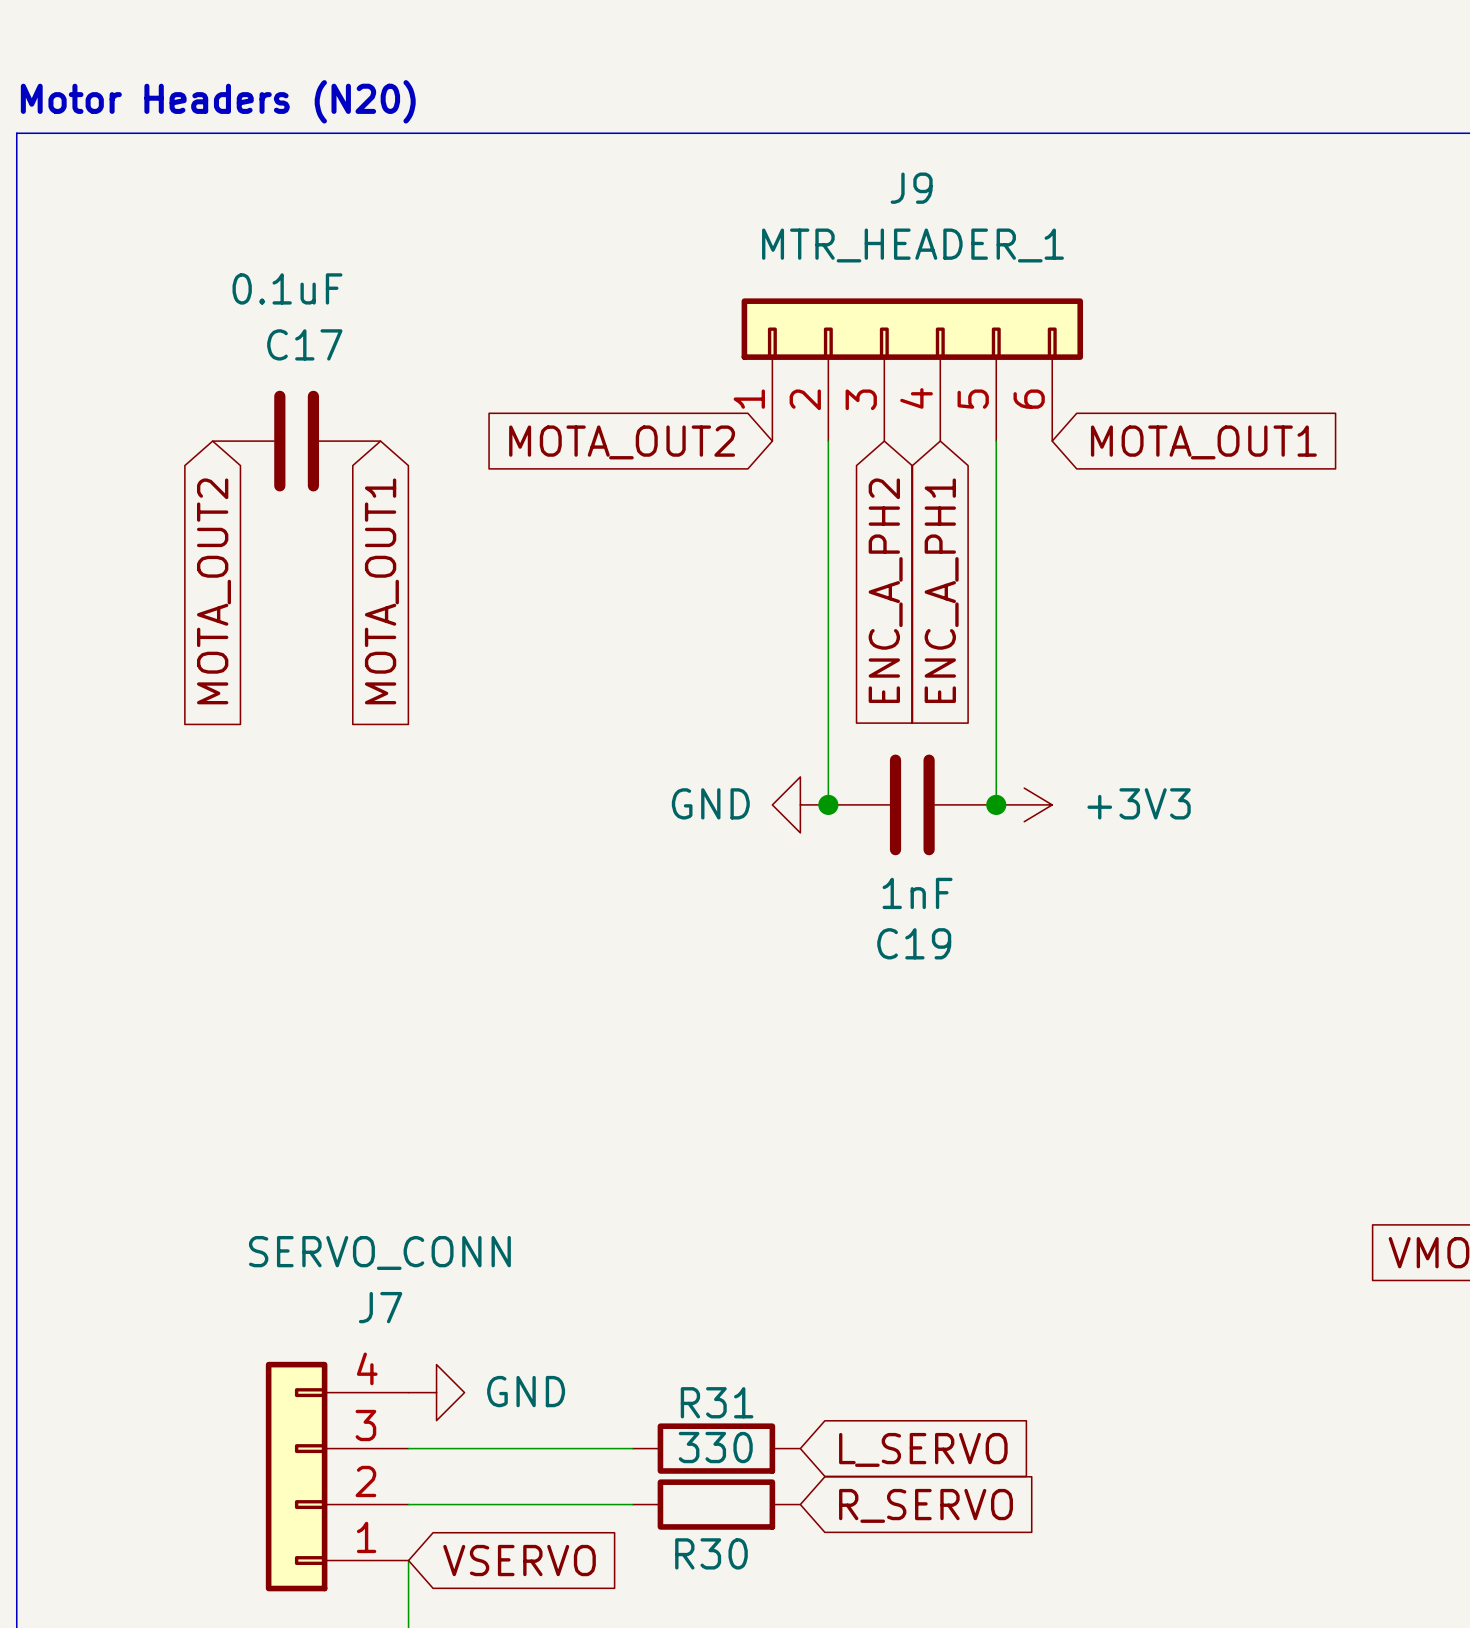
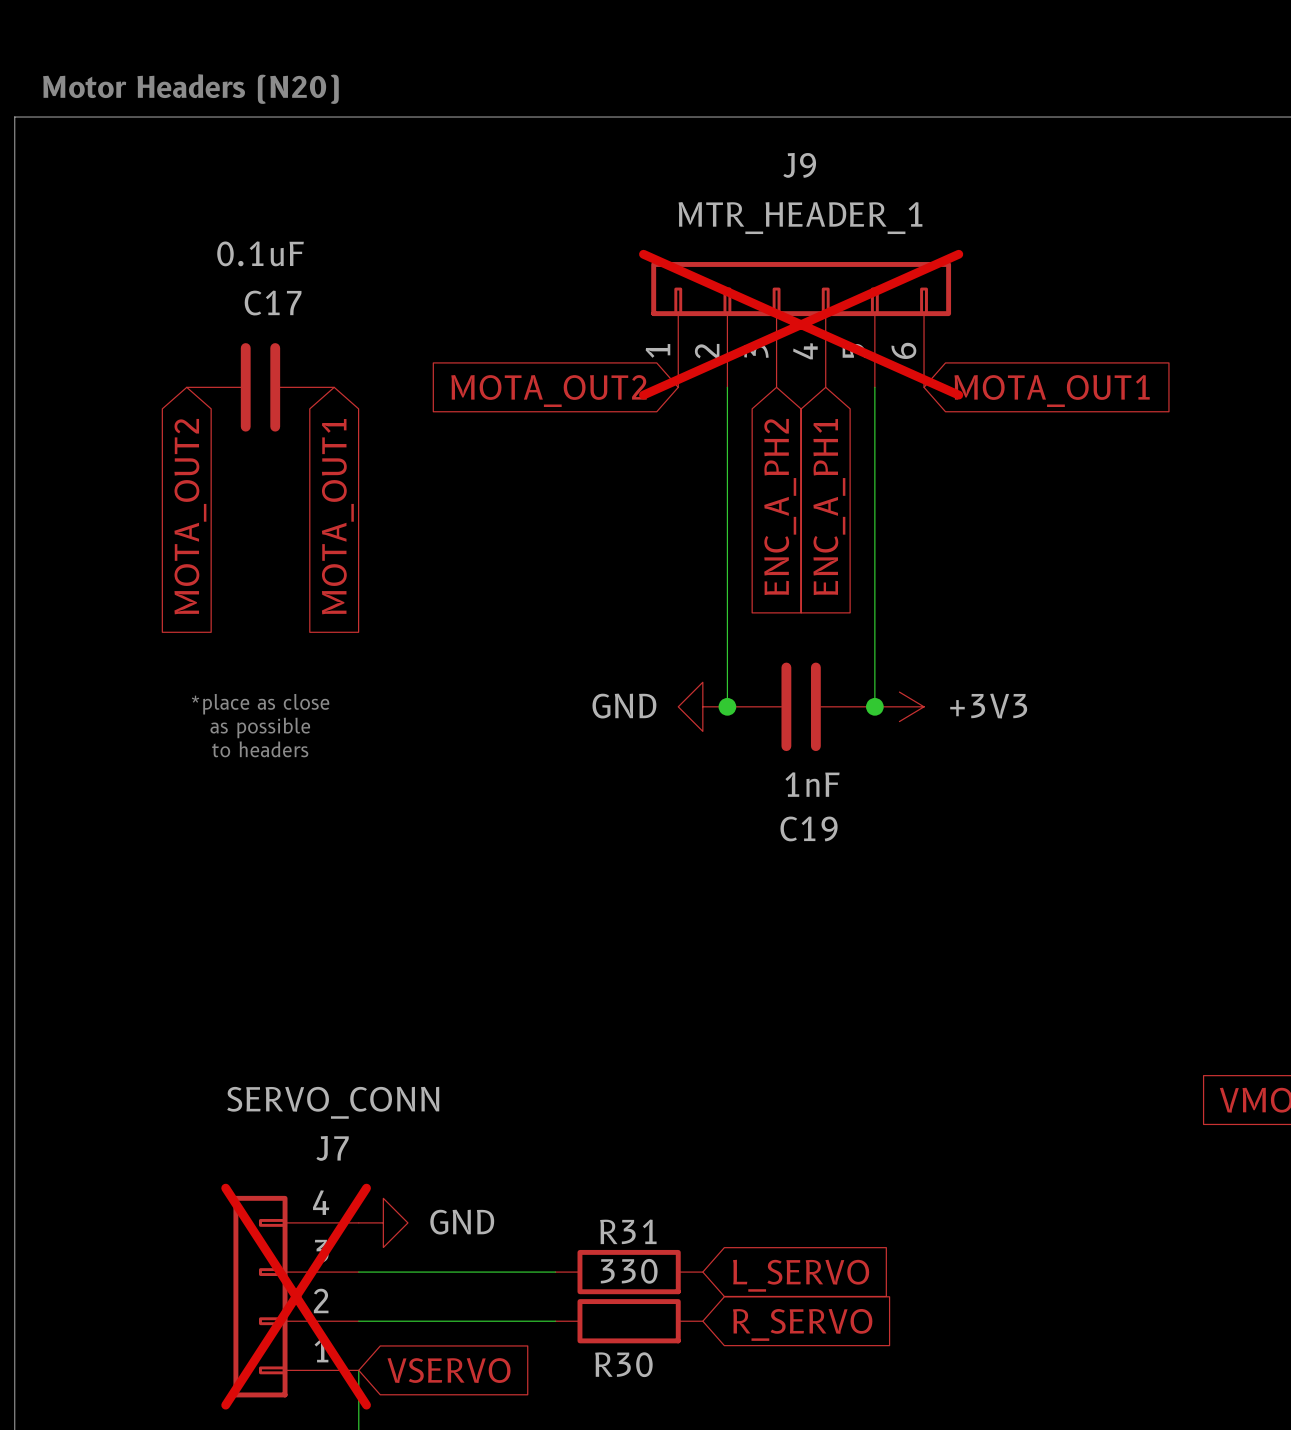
J9 do-not-place cross: none -> (801, 324)
text: none -> *place as close (260, 704)
text: none -> as possible (260, 727)
text: none -> to headers (260, 749)
J7 do-not-place cross: none -> (296, 1296)

